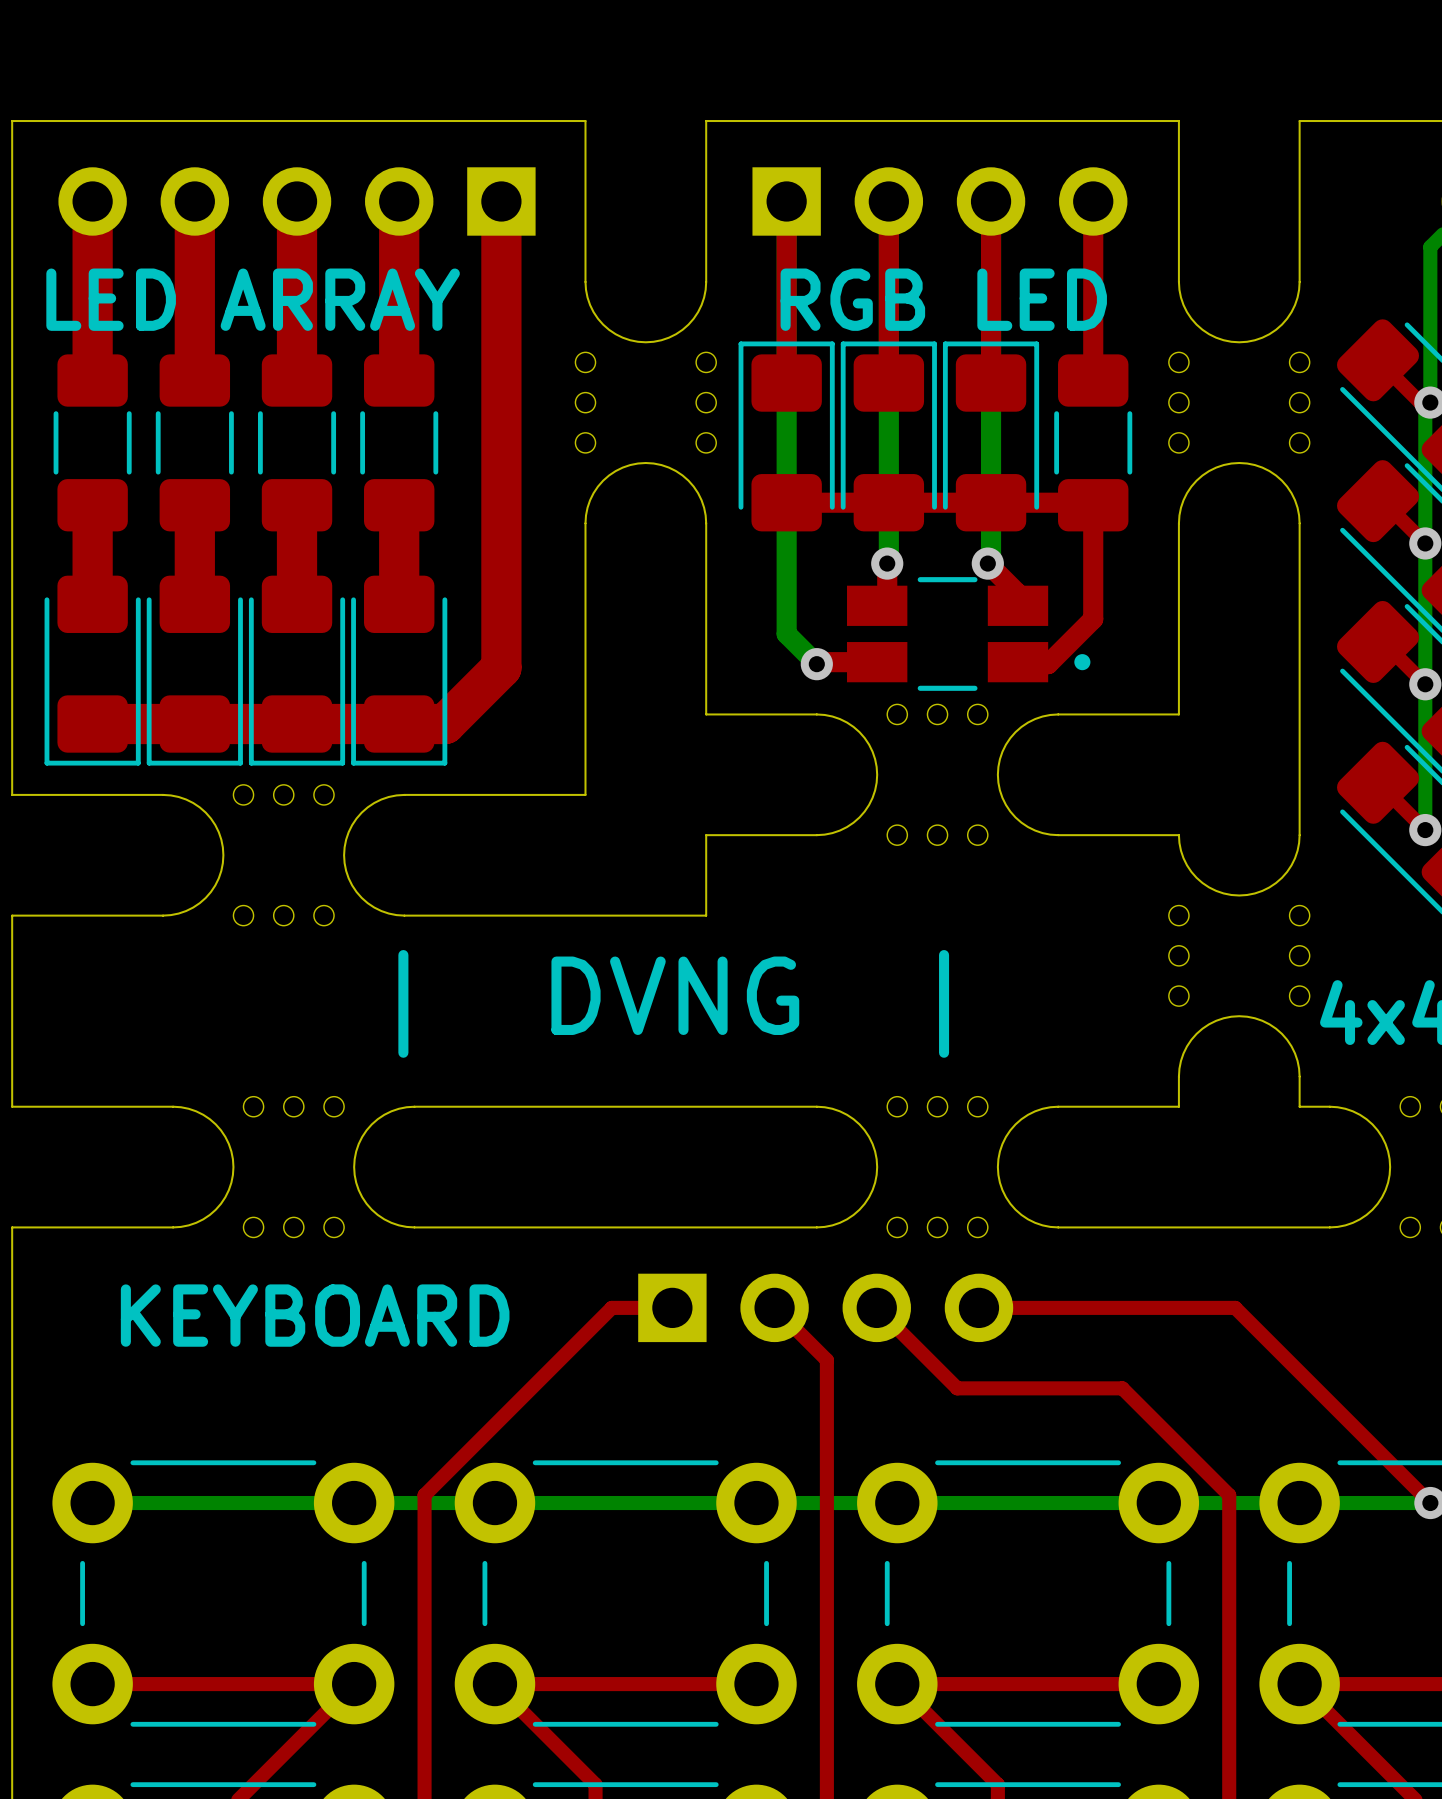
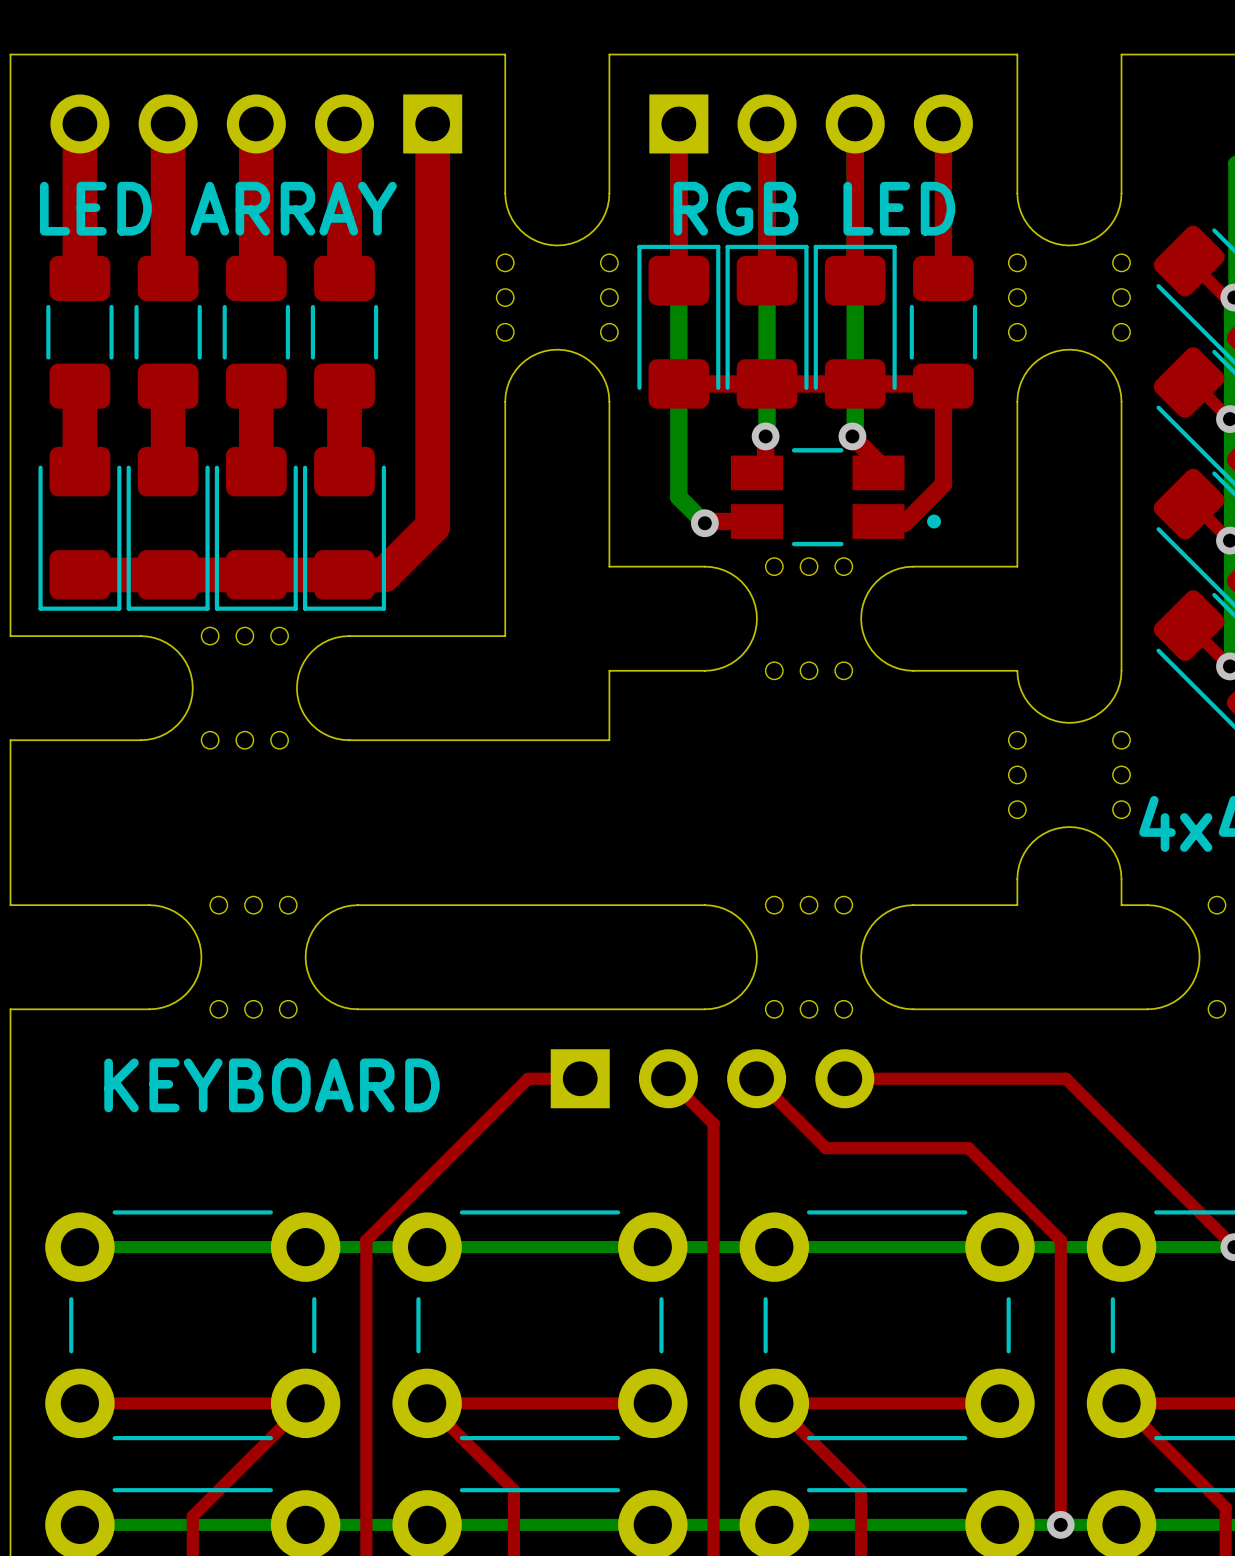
text: | DVNG | (673, 1003) -> none

